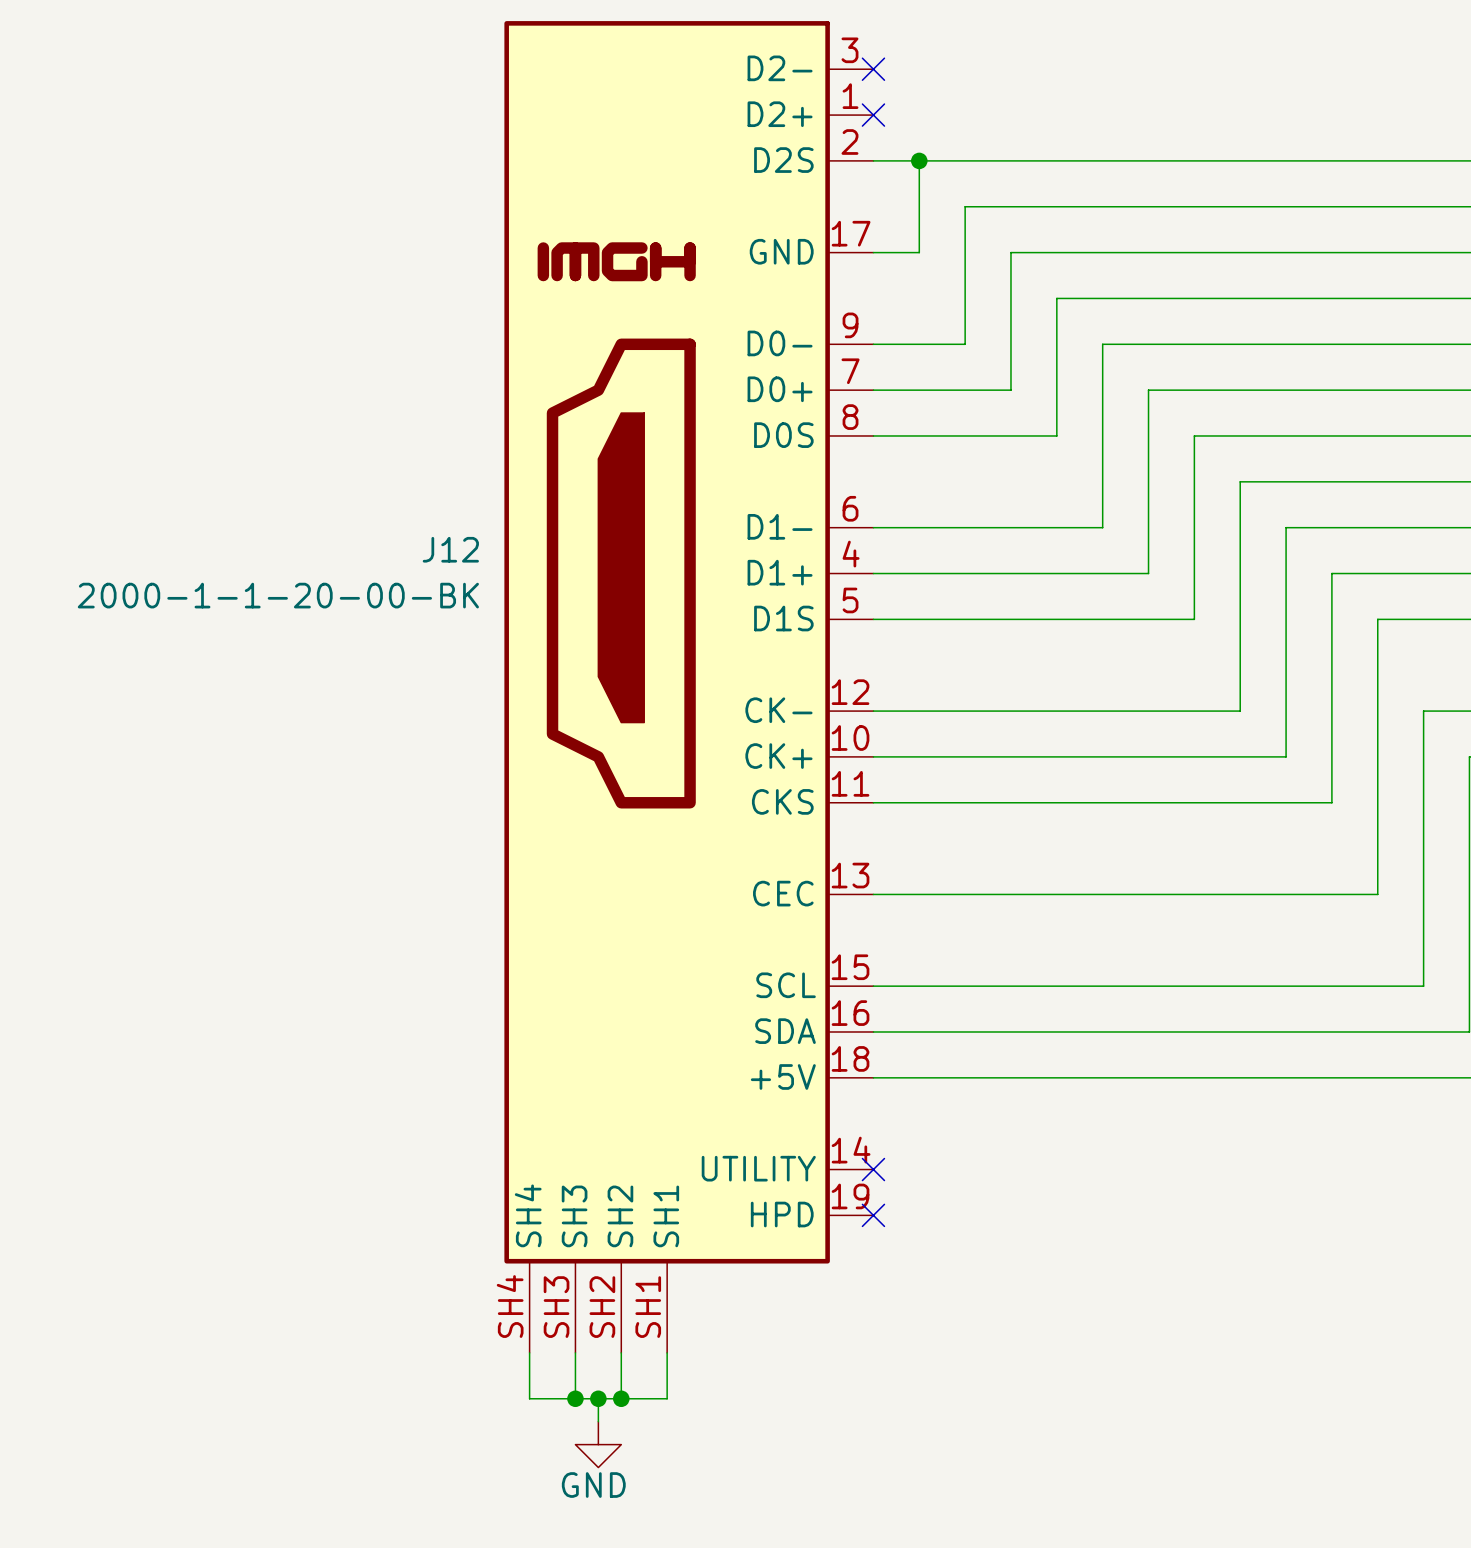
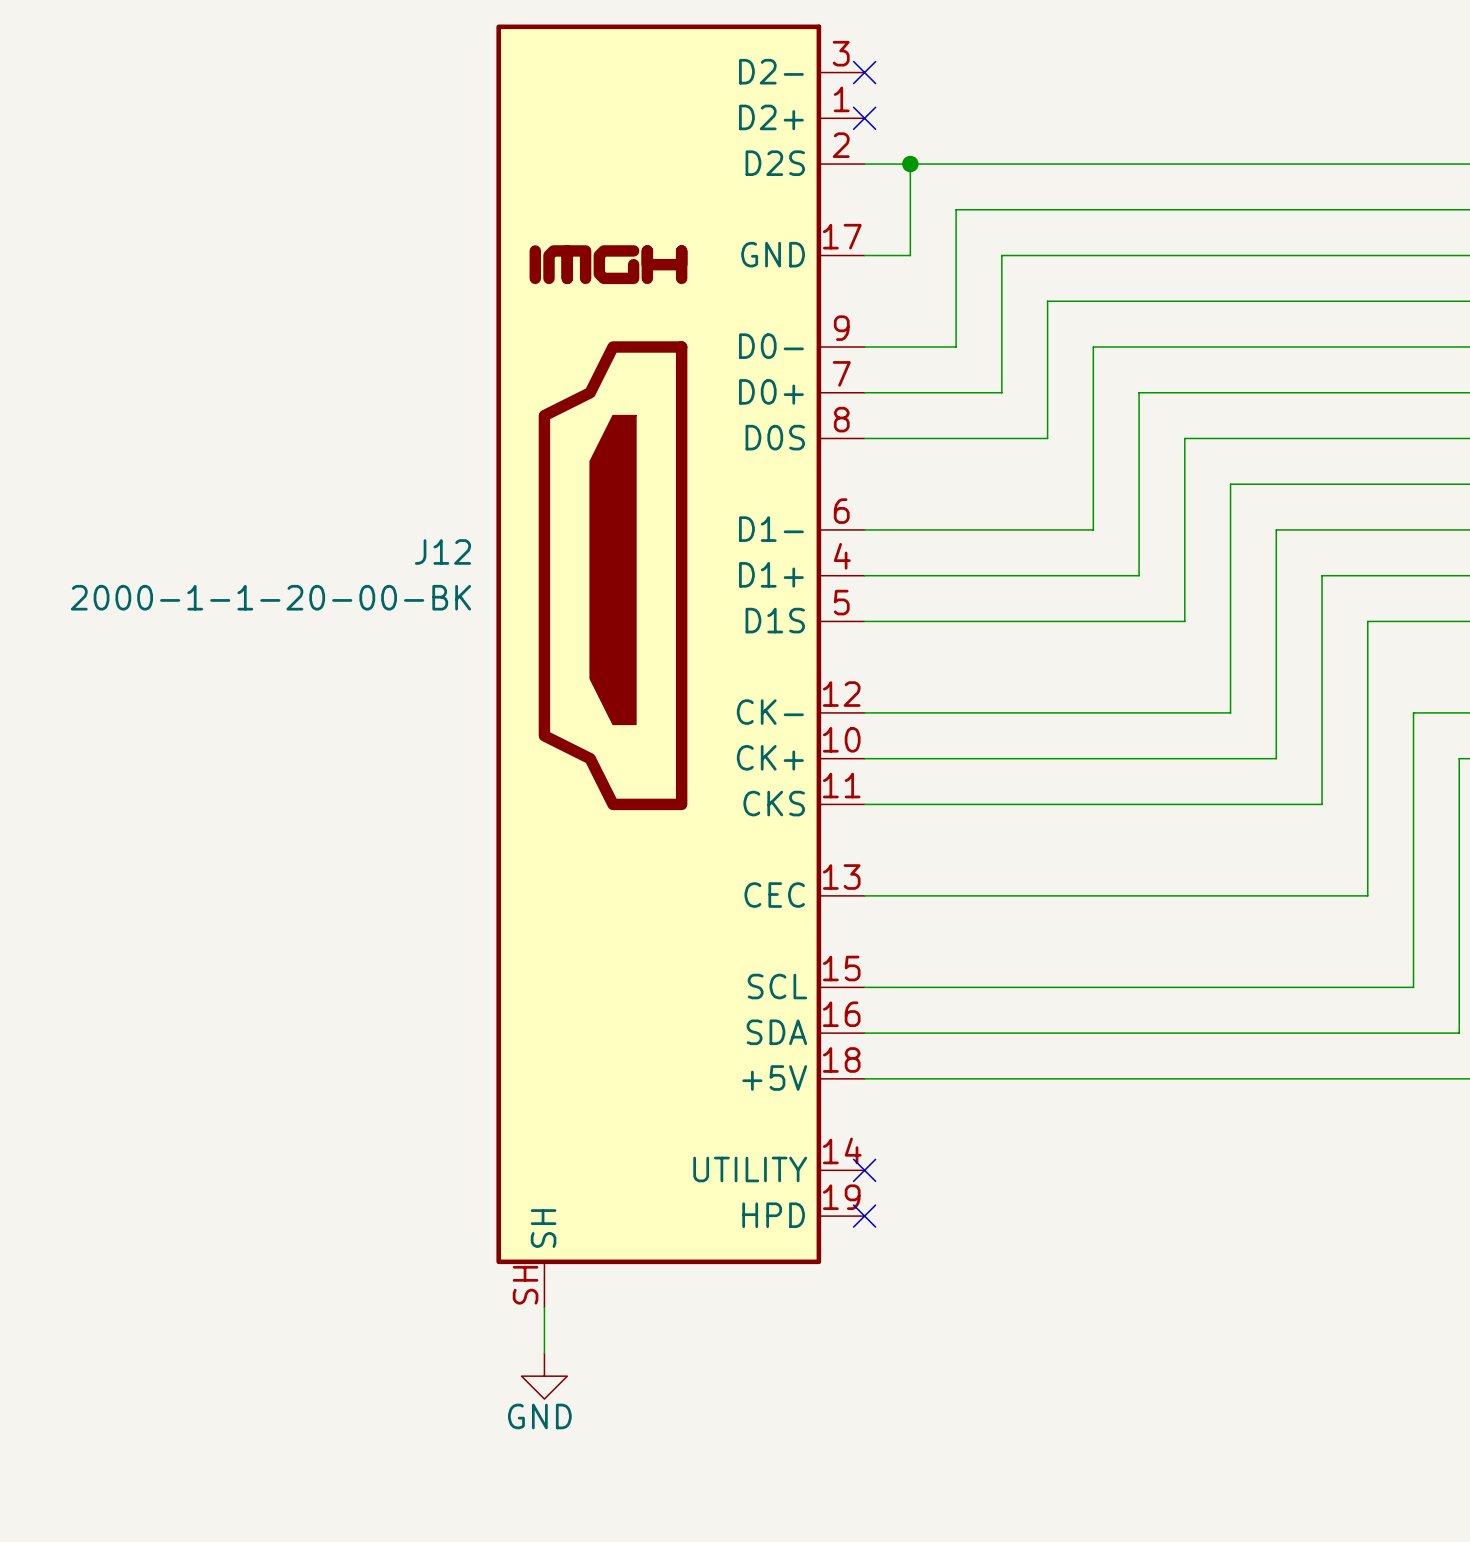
J12 symbol: [504, 21, 874, 1353] -> [496, 24, 865, 1308]
wire: (529, 1352) (529, 1398) (667, 1398) (667, 1352) -> none
wire: (575, 1352) (575, 1398) -> (544, 1307) (544, 1353)
wire: (621, 1352) (621, 1398) -> none
junction: (575, 1398) -> none
wire: (598, 1398) (598, 1421) -> none
junction: (598, 1398) -> none
junction: (621, 1398) -> none
power symbol position: GND (598, 1444) -> GND (544, 1376)

